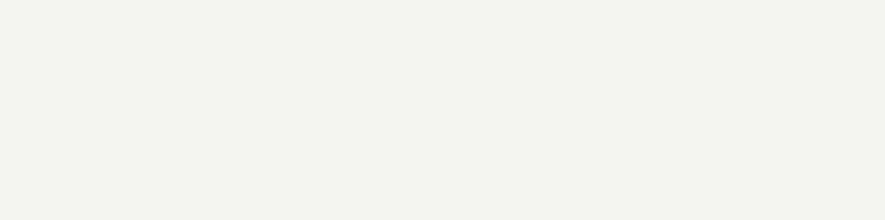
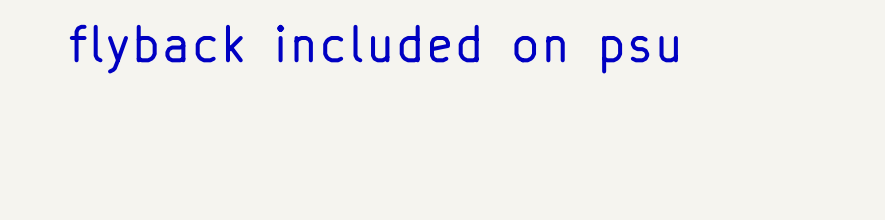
text: none -> flyback included on psu (373, 49)

